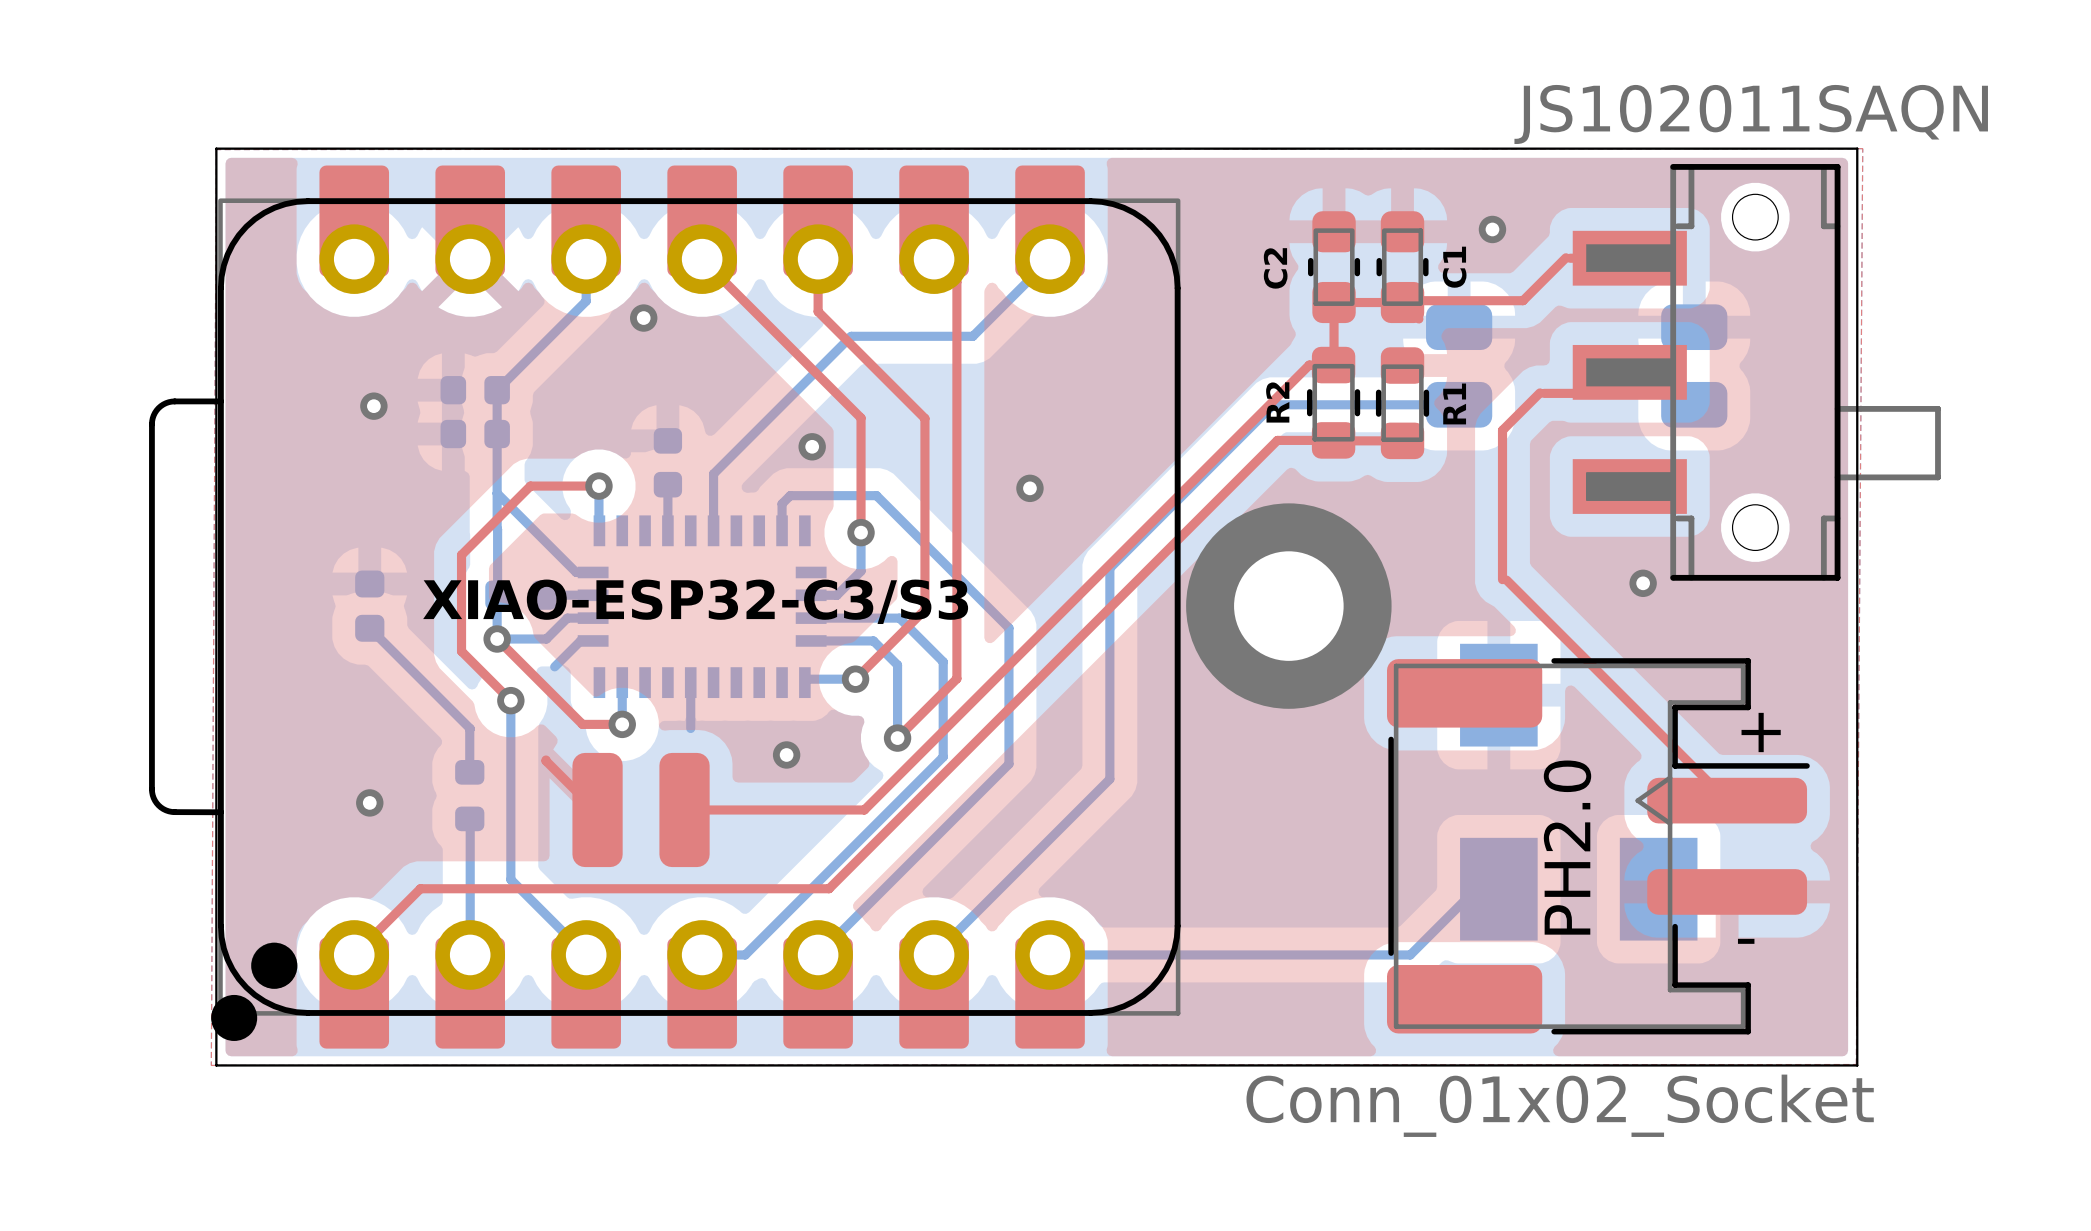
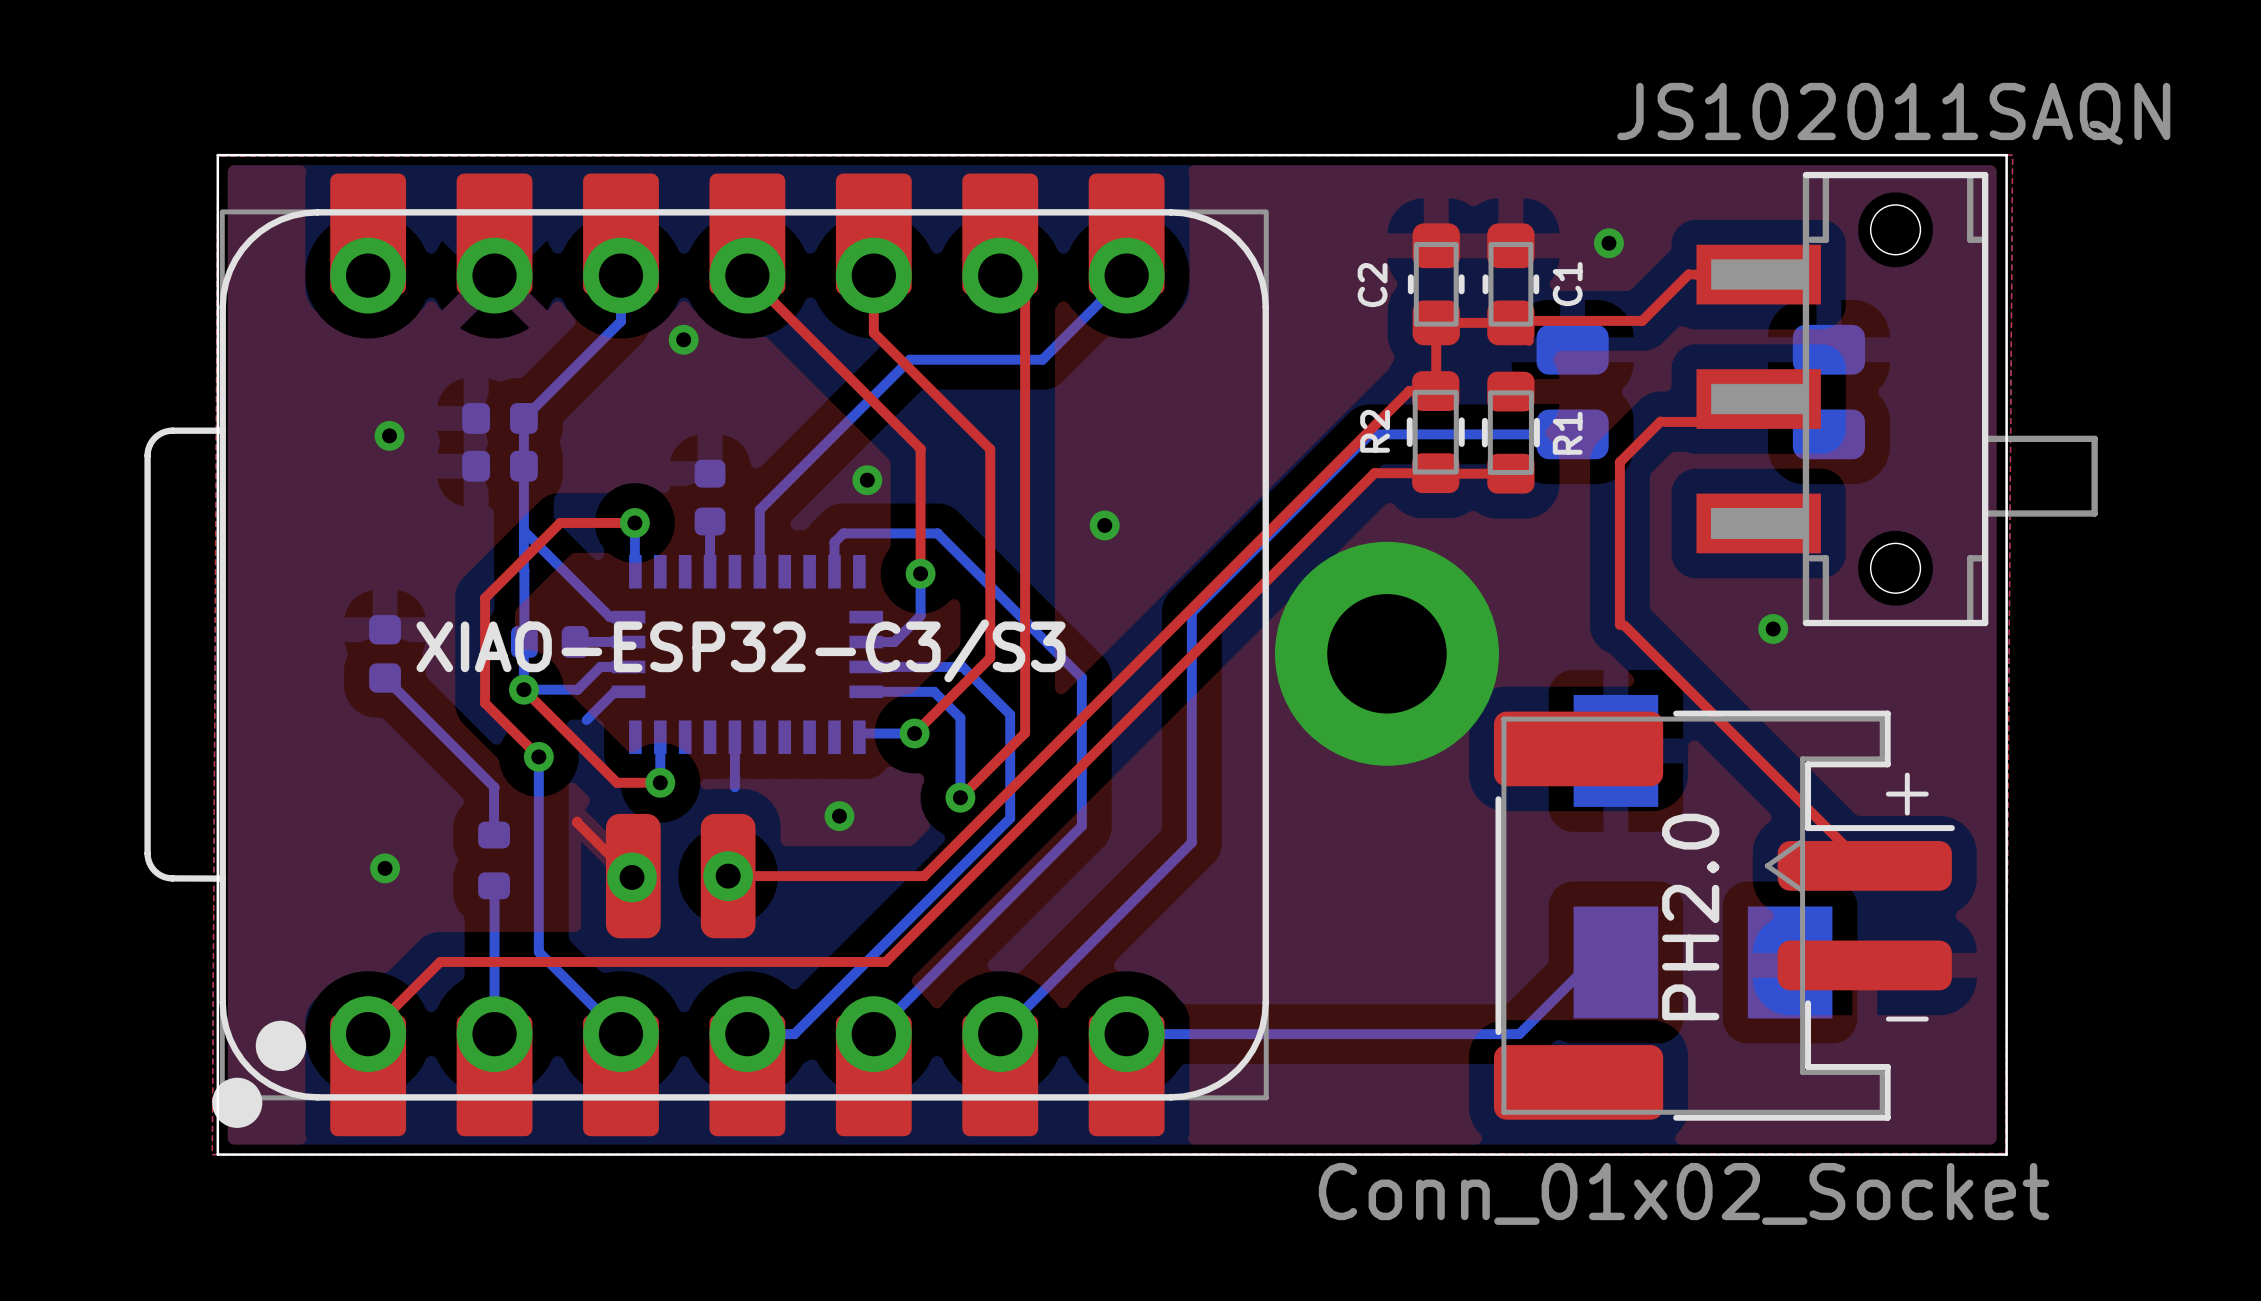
via: none -> (728, 876)
via: none -> (632, 877)

